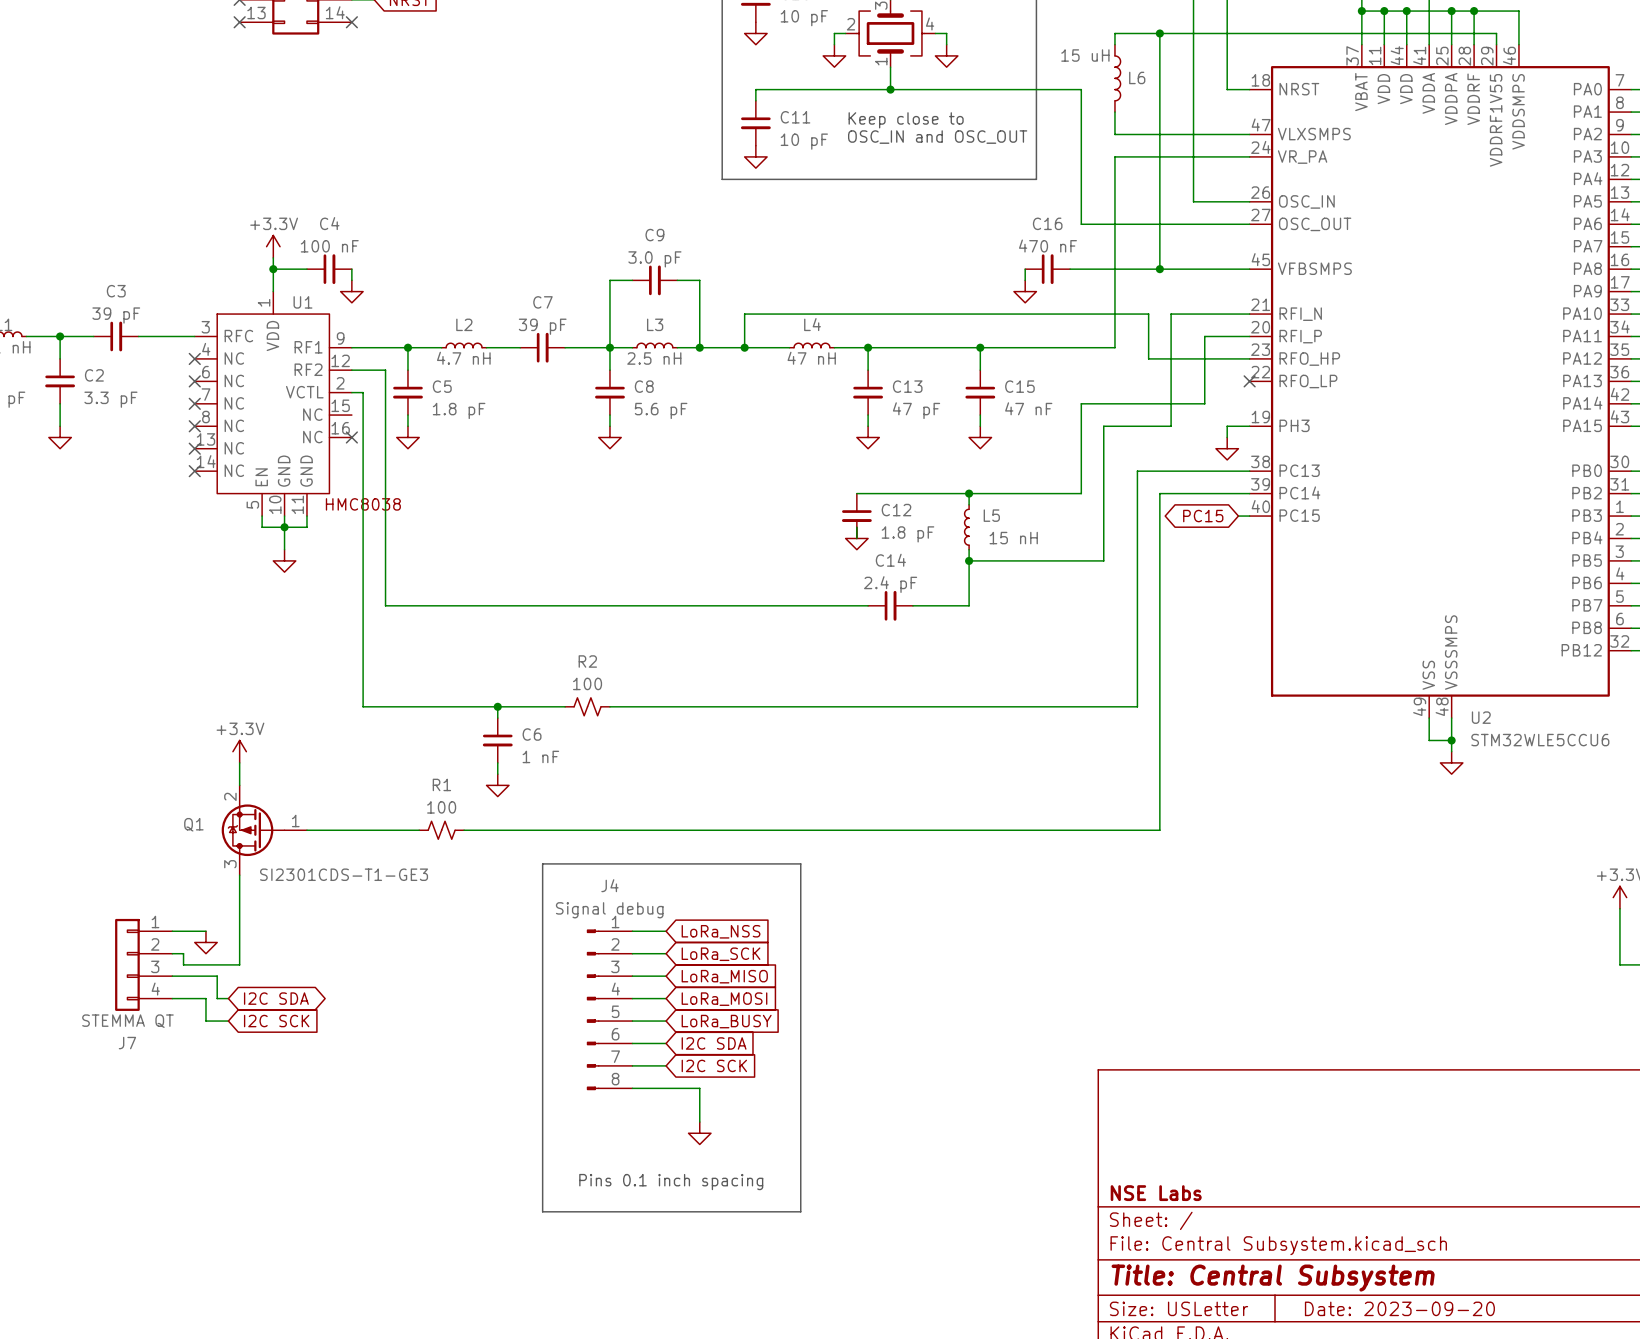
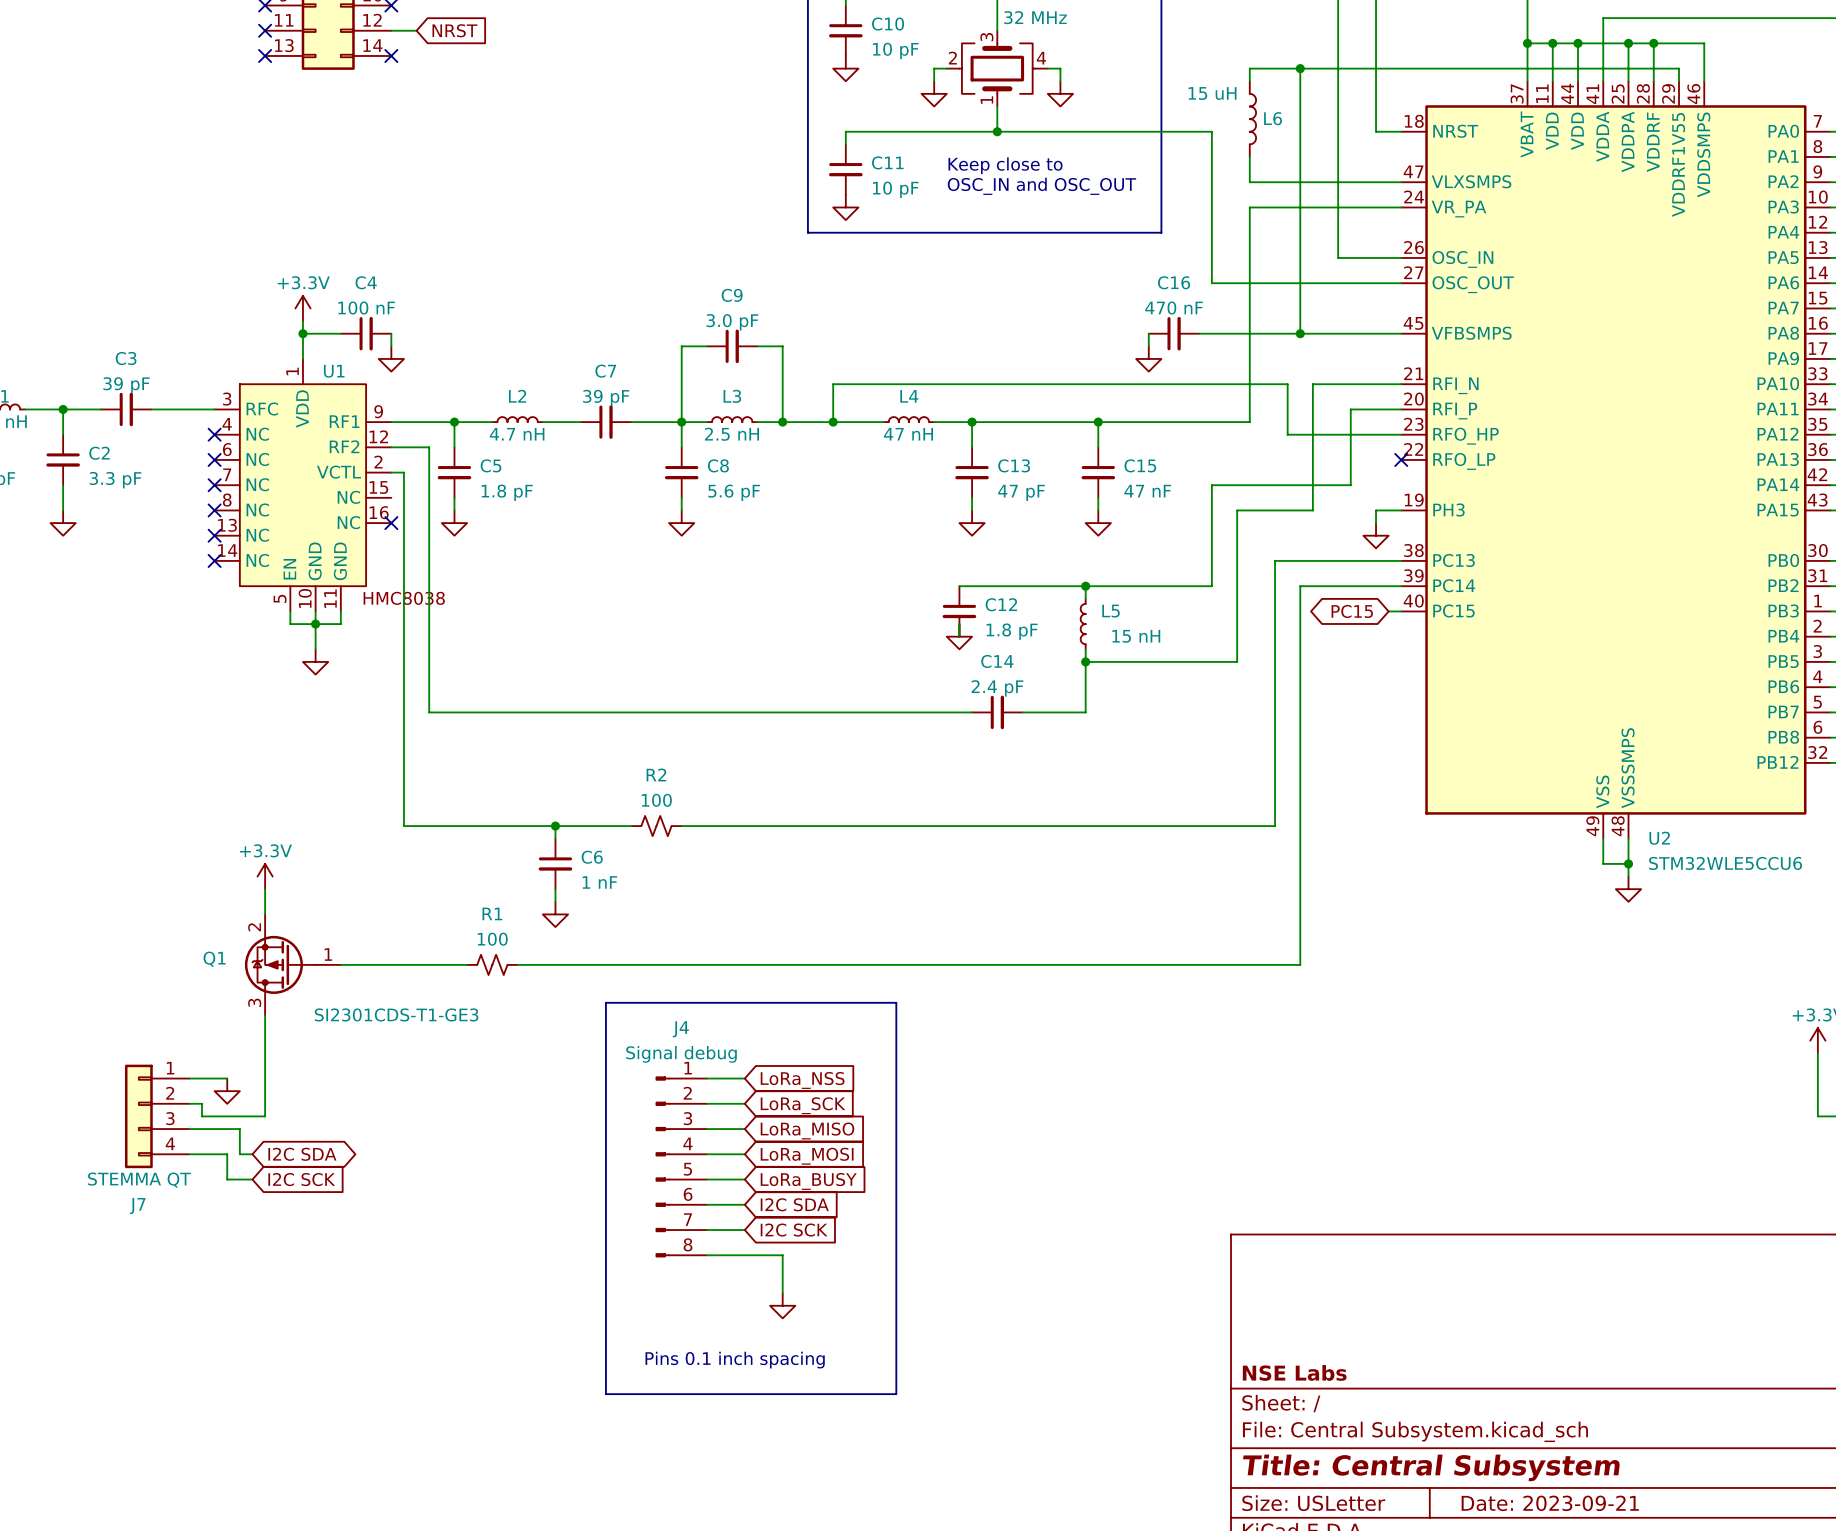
title block: Date: 2023-09-20 (1399, 1308) -> Date: 2023-09-21 (1550, 1503)

